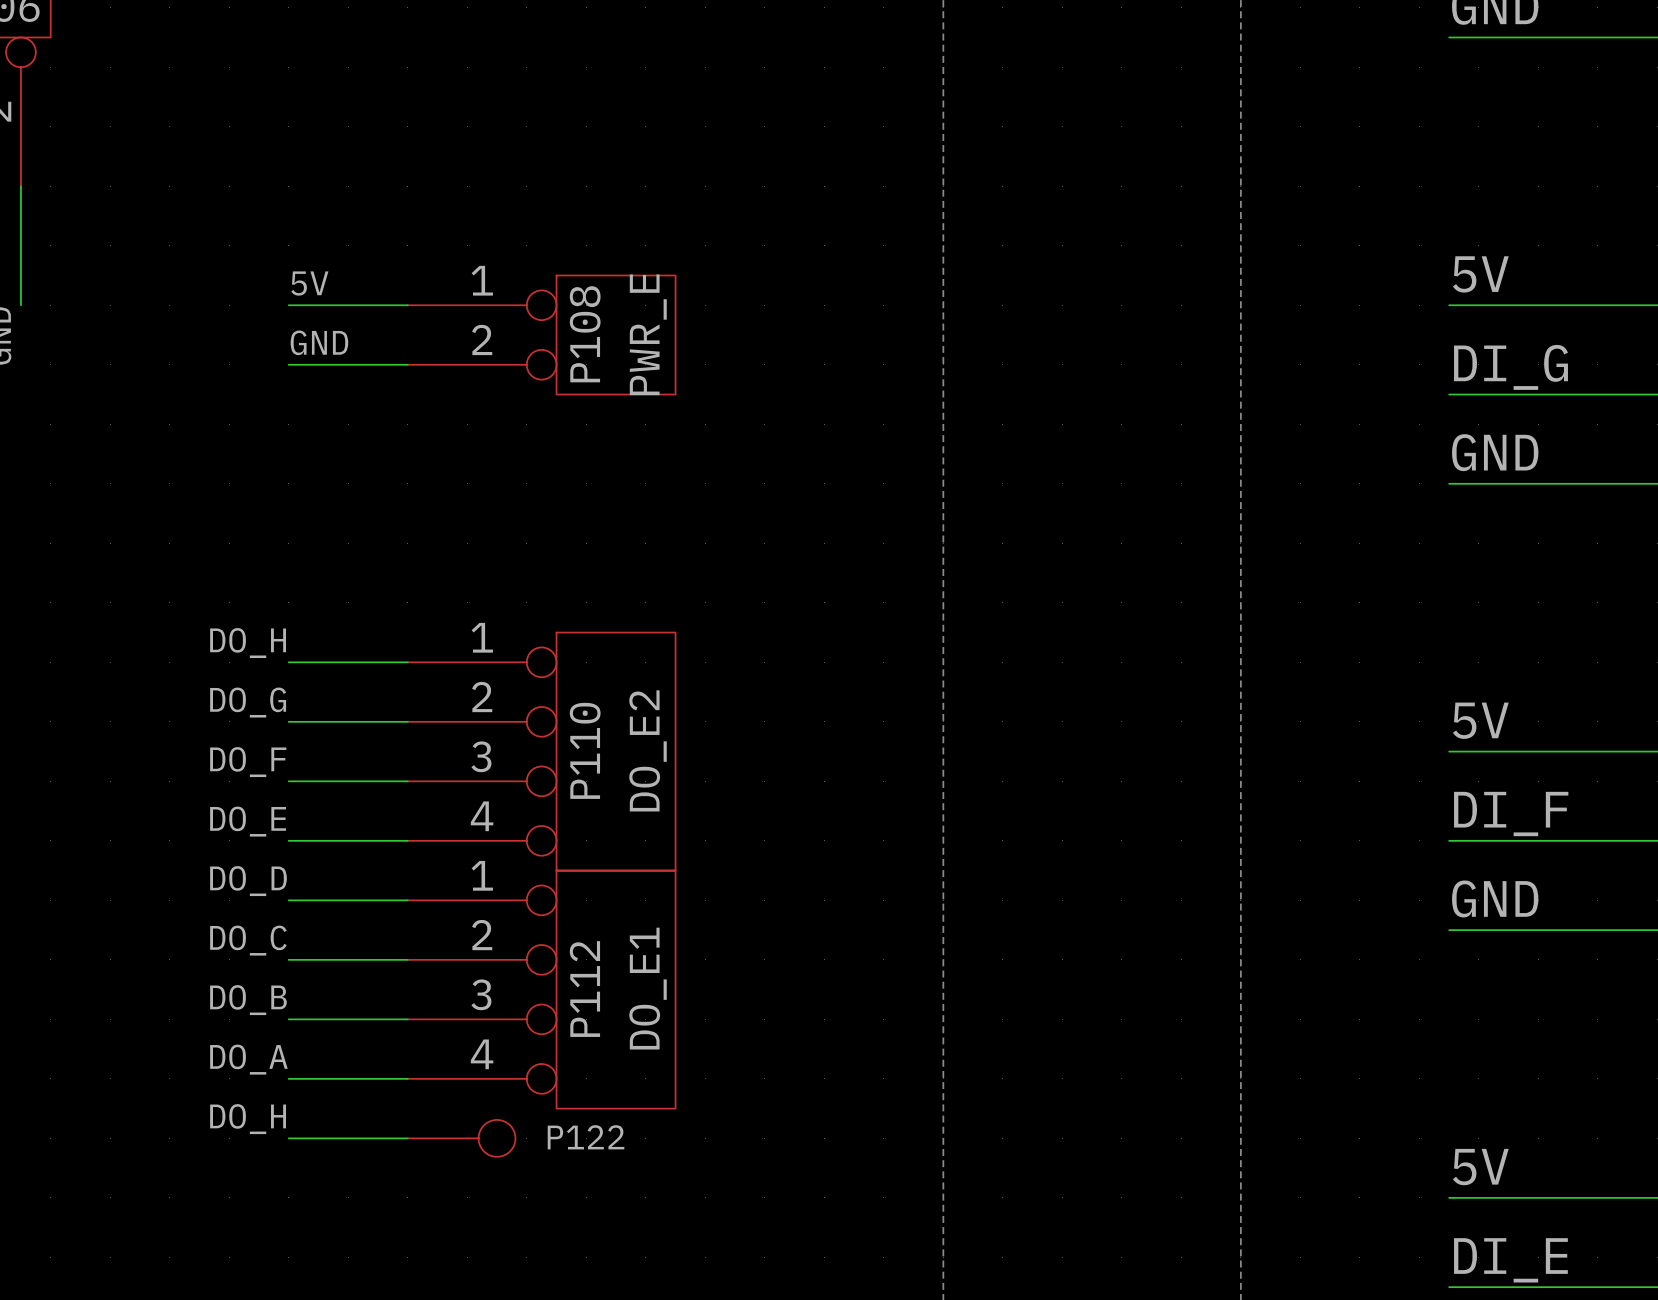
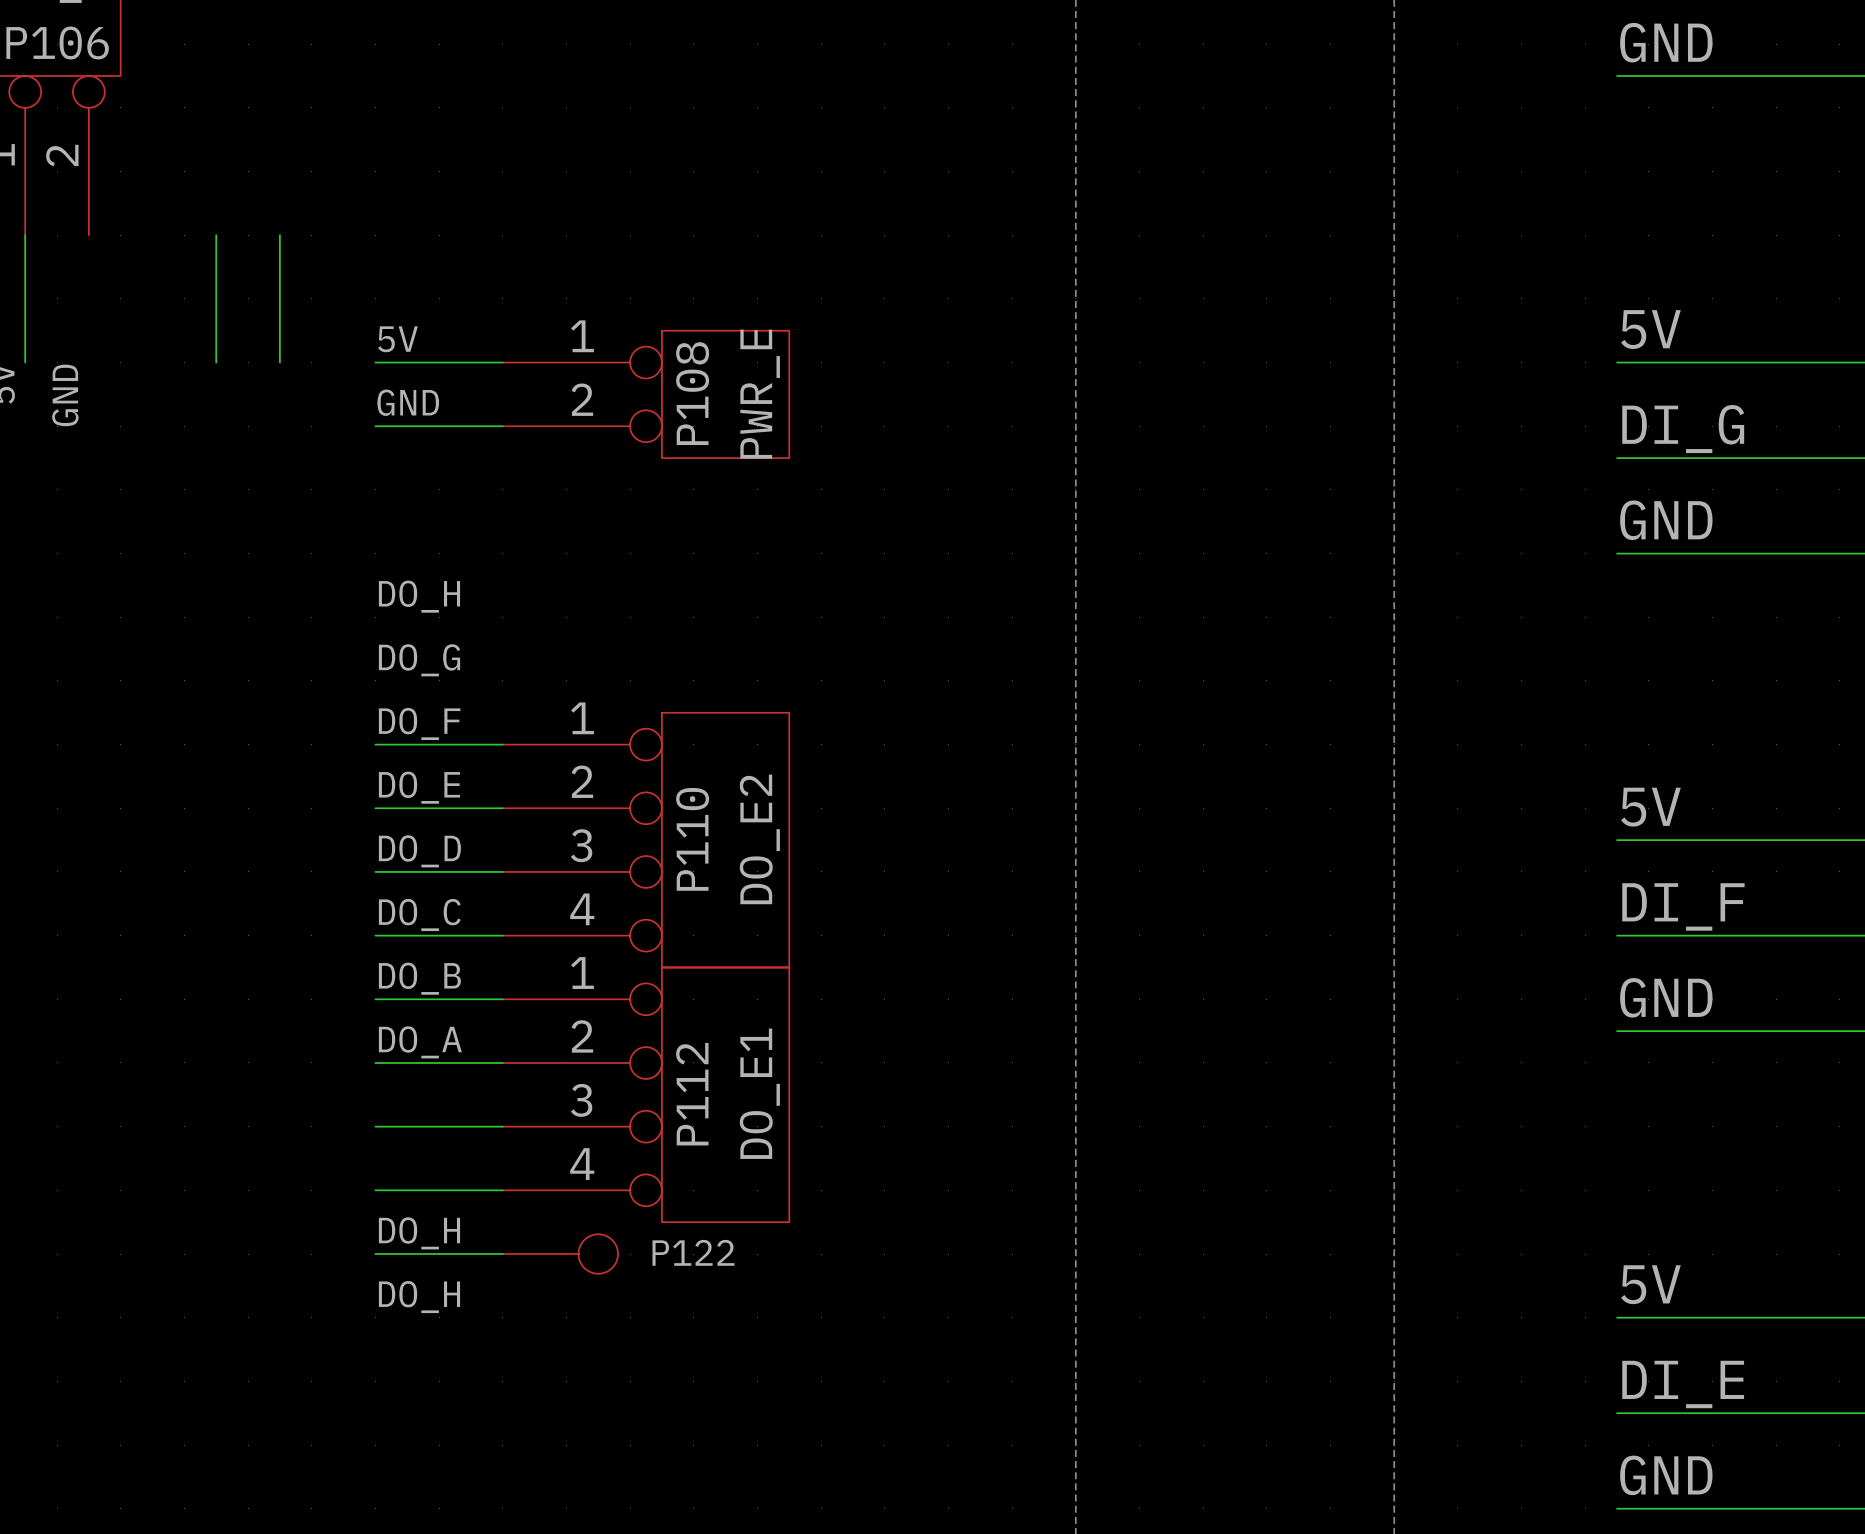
wire: (20, 186) (20, 305) -> (279, 235) (279, 362)
wire: none -> (216, 235) (216, 362)
label: none -> DO_H (419, 596)
label: none -> DO_G (419, 660)
label: DO_H (248, 643) -> DO_F (419, 723)
label: DO_G (248, 702) -> DO_E (419, 787)
label: DO_F (248, 762) -> DO_D (419, 851)
label: DO_E (248, 821) -> DO_C (419, 915)
label: DO_D (248, 881) -> DO_B (419, 978)
label: DO_C (248, 940) -> DO_A (420, 1042)
label: DO_B (248, 1000) -> none
label: DO_A (248, 1059) -> none
label position: DO_H (248, 1119) -> DO_H (419, 1233)
label: none -> DO_H (419, 1297)

